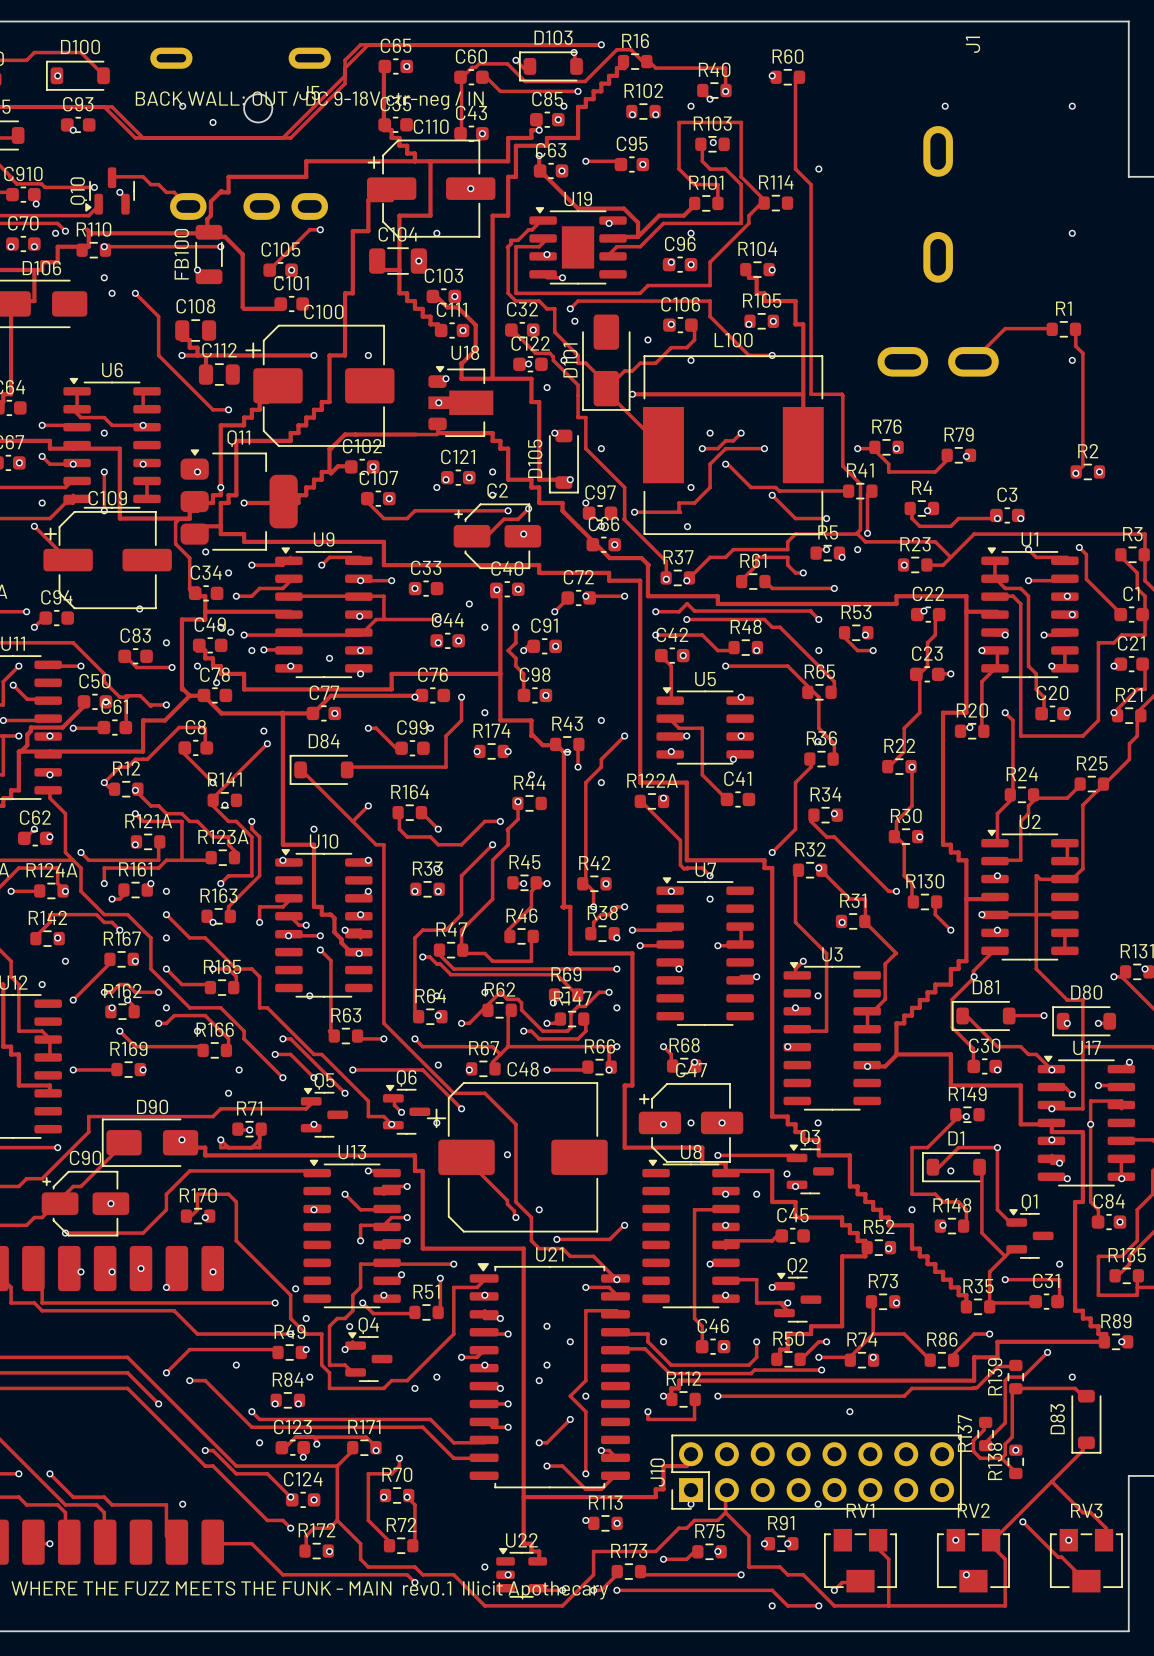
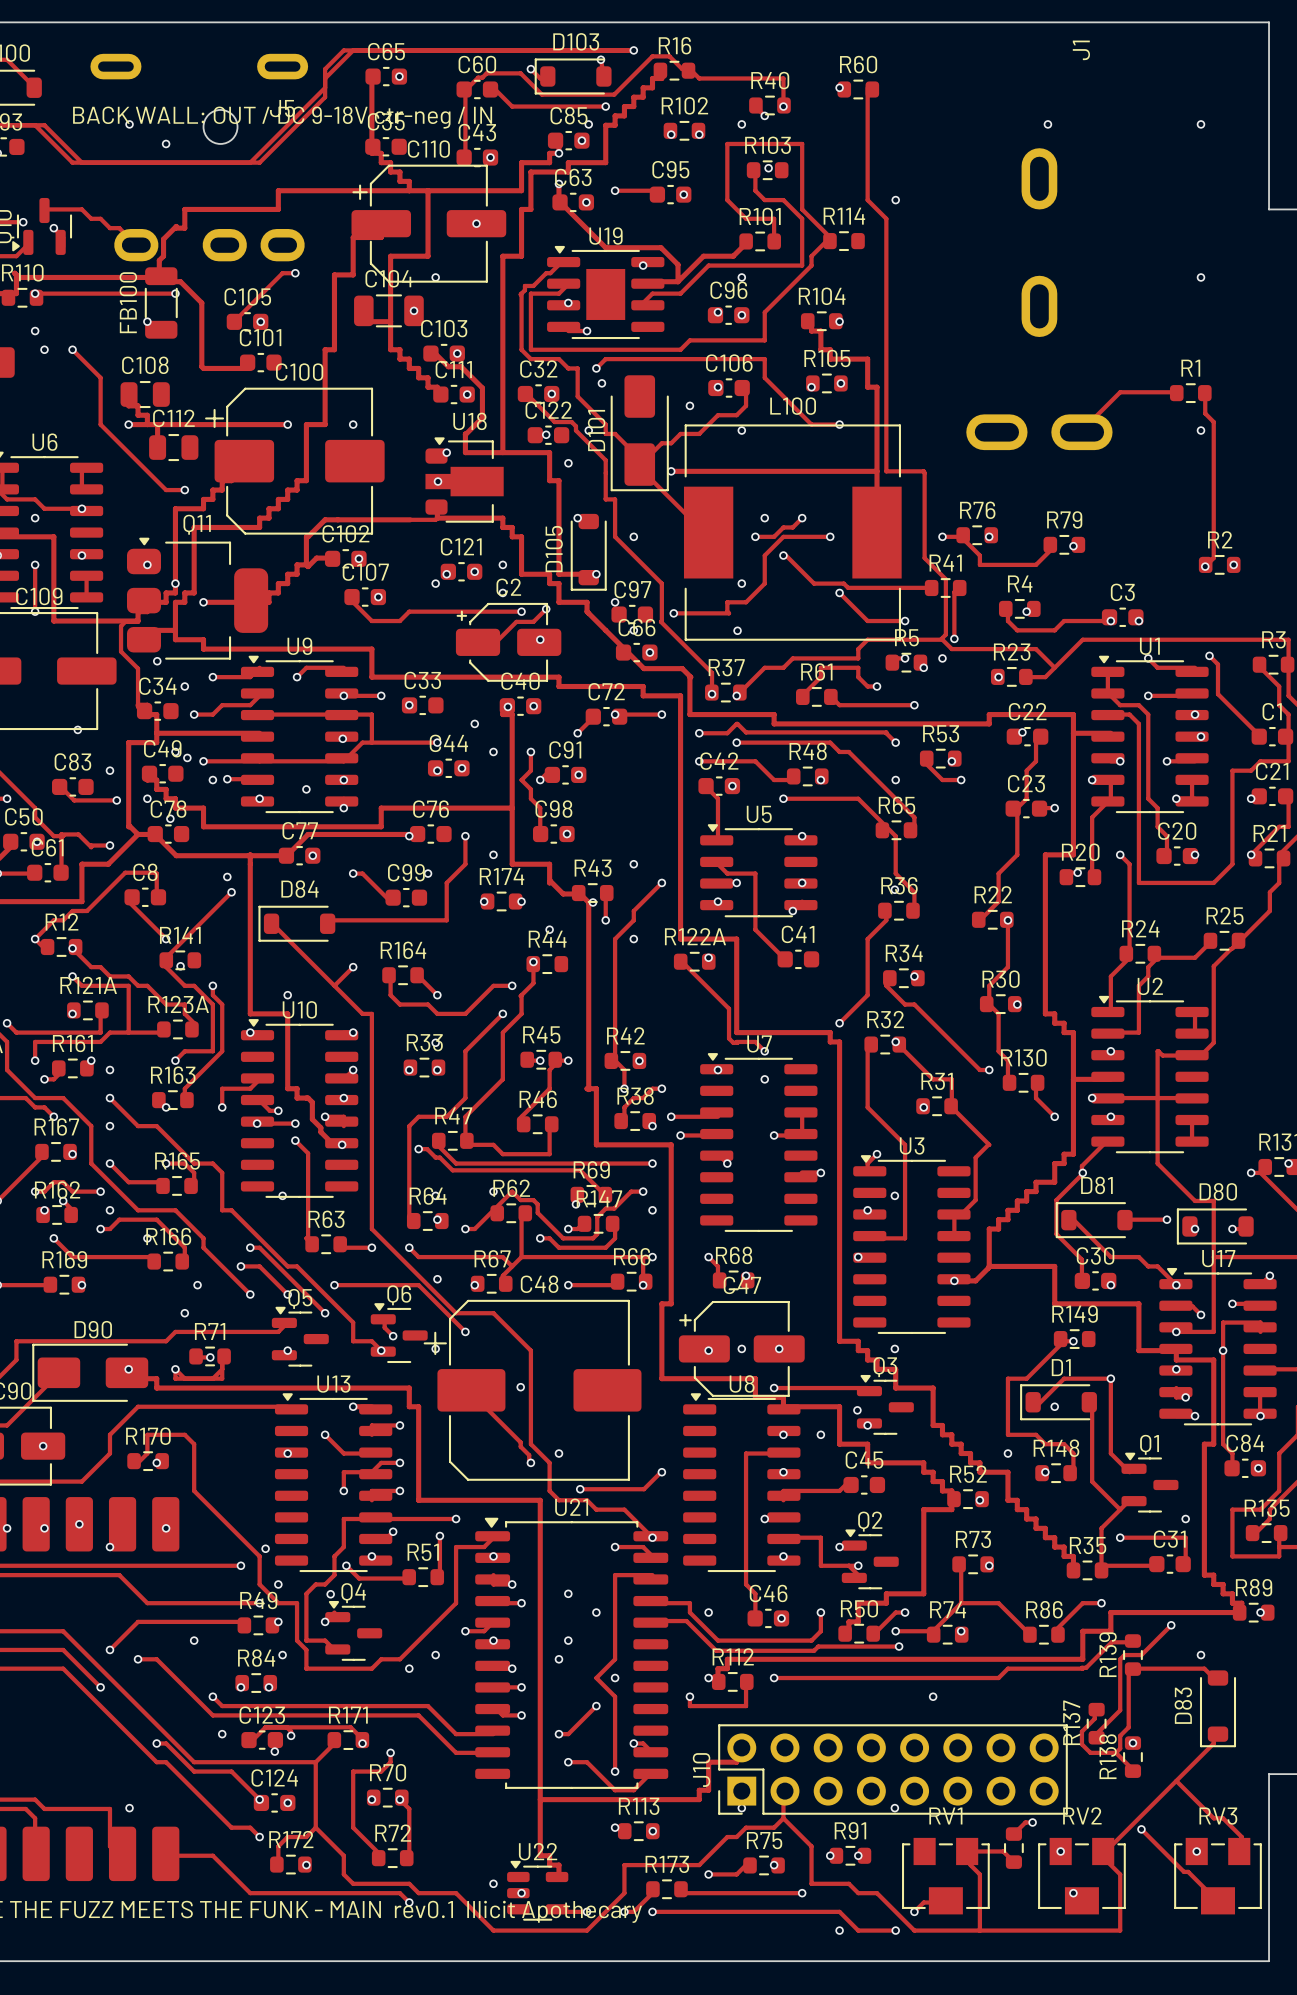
track: none -> (1032, 1822) (1025, 1822) (1013, 1834)
via: none -> (1032, 1822)
part: none -> (1013, 1848)
track: none -> (973, 1851) (1003, 1851) (1013, 1862)

